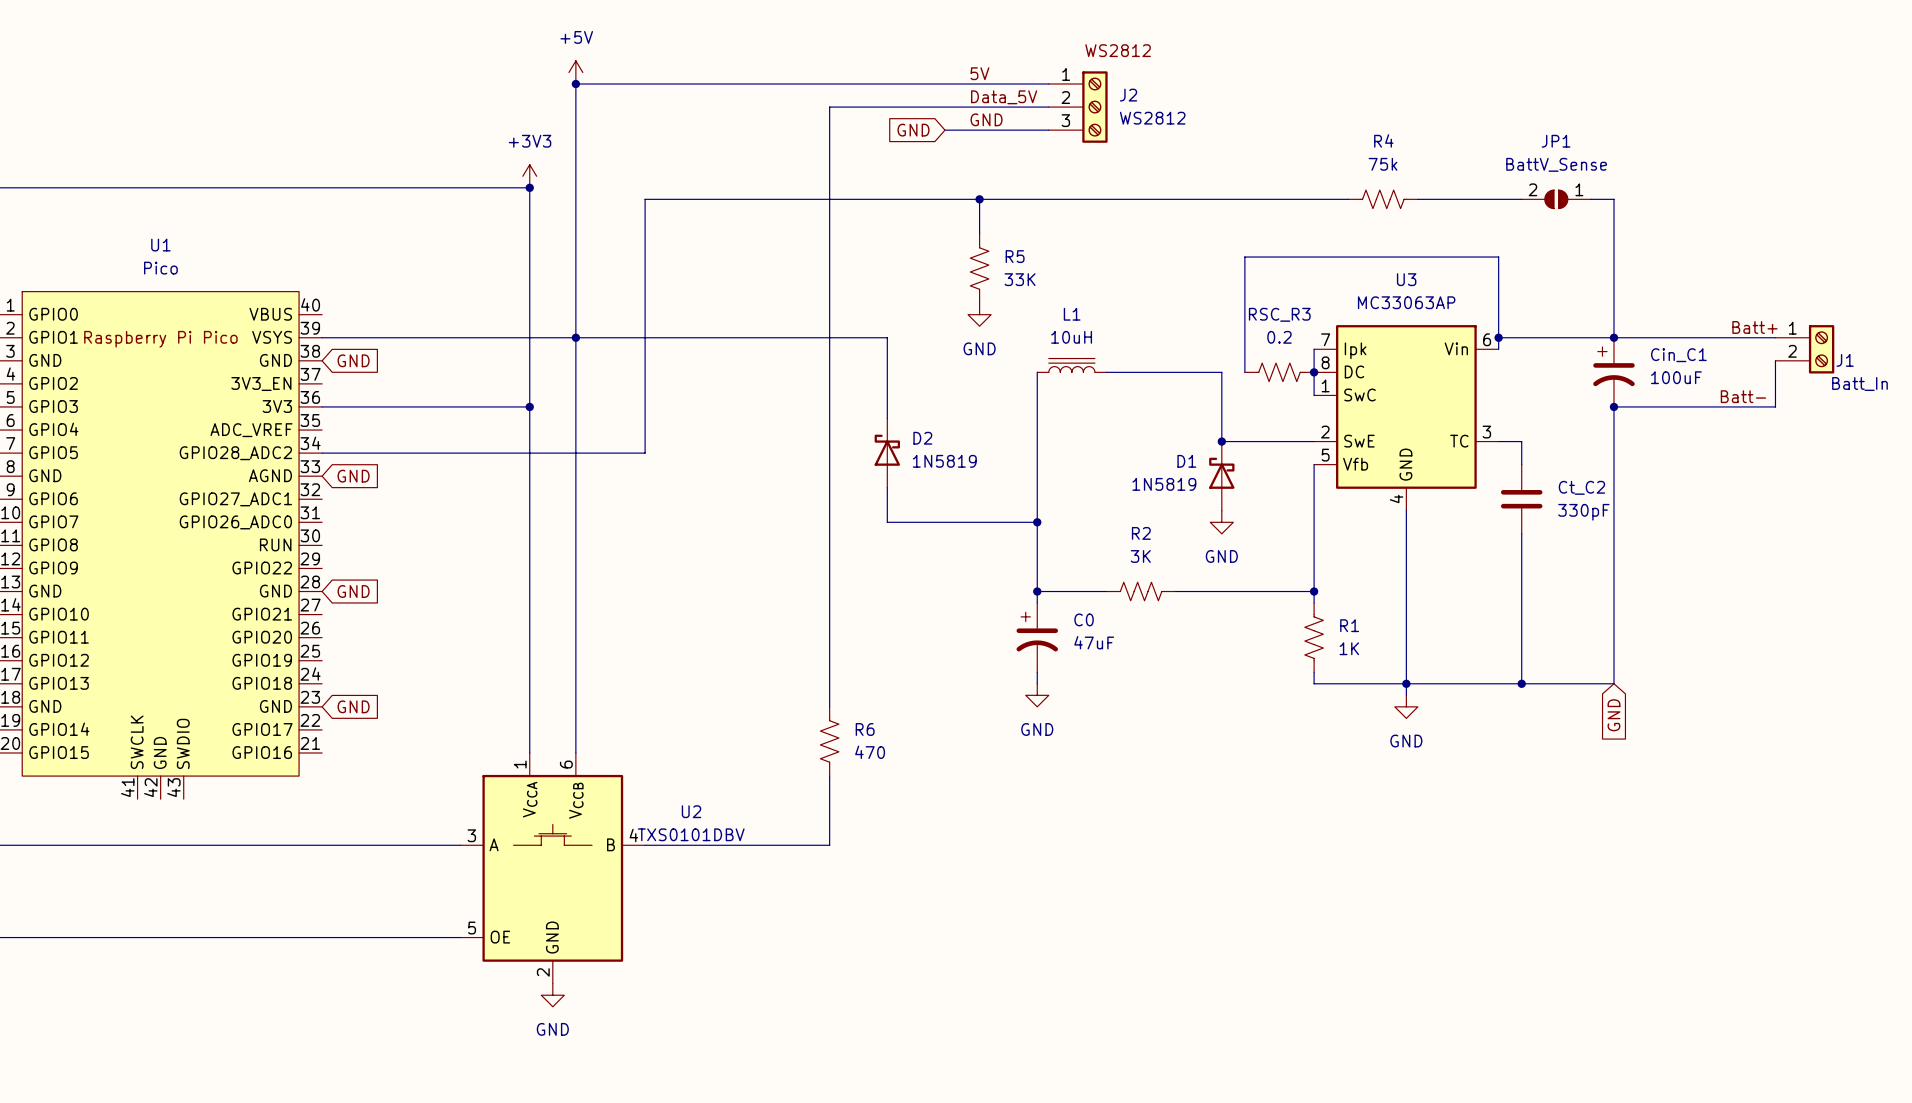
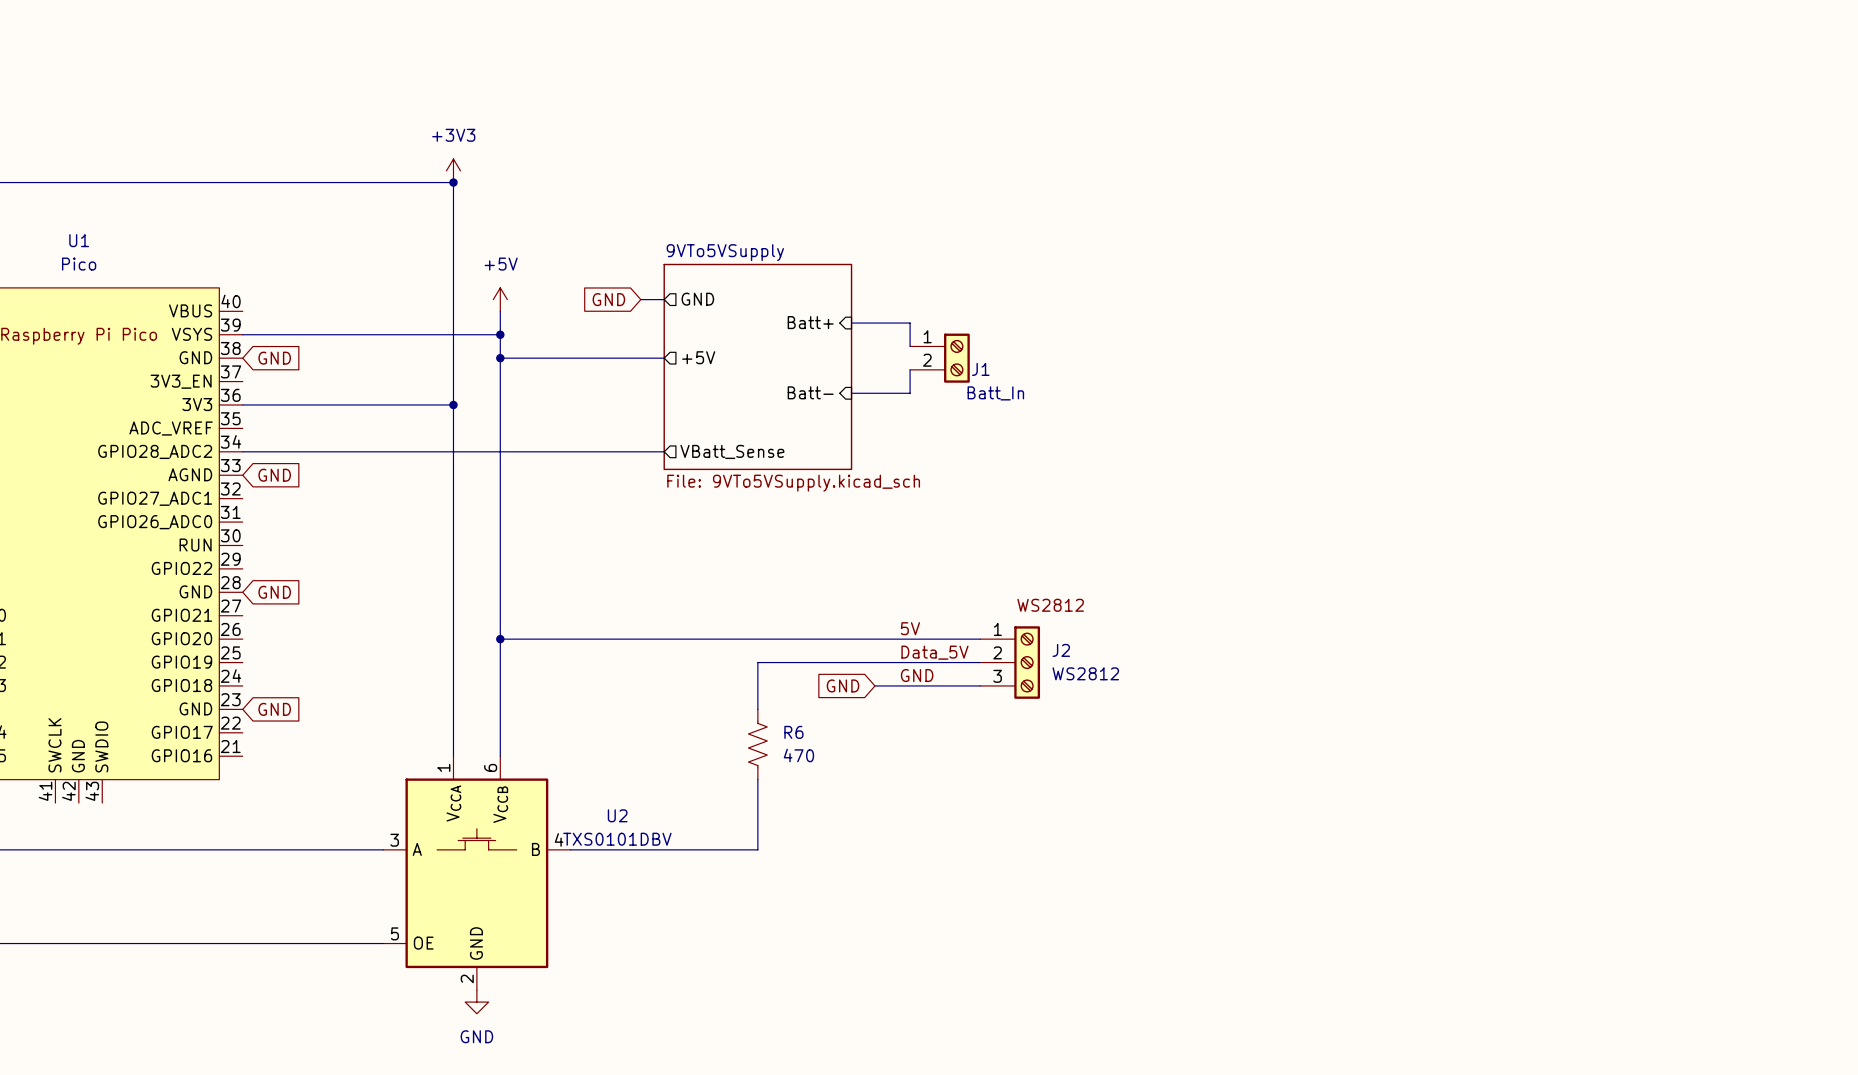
label: WS2812 (1118, 50) -> none
power symbol: +5V (575, 72) -> none
label: 5V (979, 73) -> none
junction: (575, 84) -> none
wire: (1048, 84) (575, 84) (575, 314) -> none
label: Data_5V (1004, 97) -> none
wire: (1048, 107) (829, 107) (829, 660) -> (980, 662) (757, 662)
J2 position: (1078, 107) -> (1010, 662)
label: GND (986, 119) -> none
global label: GND (913, 130) -> none
wire: (944, 130) (1048, 130) -> none
wire: (979, 199) (979, 233) -> none
junction: (979, 199) -> none
wire: (1348, 199) (645, 199) (645, 453) -> (664, 451) (570, 451)
R4: 75k (1383, 199) -> none
wire: (1417, 199) (1521, 199) -> none
JP1: BattV_Sense (1556, 199) -> none
wire: (1590, 199) (1613, 199) (1613, 337) -> none
R5: 33K (979, 268) -> none
sheet pin: none -> GND (697, 299)
power symbol: none -> +5V (500, 299)
global label: none -> GND (608, 299)
wire: none -> (640, 299) (664, 299)
power symbol: GND (979, 314) -> none
sheet pin: none -> Batt+ (810, 322)
wire: none -> (851, 323) (910, 323) (910, 346)
label: Batt+ (1754, 327) -> none
wire: (575, 337) (887, 337) (887, 418) -> none
wire: (1498, 337) (1775, 337) -> none
junction: (1498, 337) -> none
junction: (1613, 337) -> none
wire: (1314, 349) (1314, 395) -> none
wire: (1498, 349) (1498, 257) (1244, 257) (1244, 372) -> none
J1 position: (1804, 349) -> (939, 358)
wire: none -> (500, 358) (664, 358)
junction: none -> (500, 358)
sheet pin: none -> +5V (698, 357)
wire: (1775, 360) (1775, 406) (1613, 406) (1613, 683) (1314, 683) (1314, 672) -> none
L1: 10uH (1071, 365) -> none
sheet 9VTo5VSupply: none -> File: 9VTo5VSupply.kicad_sch (757, 366)
wire: none -> (910, 369) (910, 393) (851, 393)
wire: (1037, 372) (1037, 603) -> none
wire: (1106, 372) (1221, 372) (1221, 441) (1314, 441) -> none
RSC_R3: 0.2 (1279, 372) -> none
junction: (1314, 372) -> none
Cin_C1: 100uF (1613, 372) -> none
sheet pin: none -> Batt- (810, 392)
label: Batt- (1743, 396) -> none
junction: (1613, 406) -> none
U3: MC33063AP (1406, 417) -> none
junction: (1221, 441) -> none
wire: (1498, 441) (1521, 441) (1521, 464) -> none
sheet pin: none -> VBatt_Sense (732, 451)
D2: 1N5819 (887, 453) -> none
wire: (1314, 464) (1314, 603) -> none
D1: 1N5819 (1221, 476) -> none
wire: (887, 487) (887, 522) (1037, 522) -> none
Ct_C2: 330pF (1521, 499) -> none
wire: (1406, 510) (1406, 695) -> none
junction: (1037, 522) -> none
power symbol: GND (1221, 522) -> none
wire: (1521, 533) (1521, 683) -> none
wire: (1037, 591) (1106, 591) -> none
junction: (1037, 591) -> none
R2: 3K (1141, 591) -> none
wire: (1175, 591) (1314, 591) -> none
junction: (1314, 591) -> none
label: none -> WS2812 (1050, 605)
label: none -> 5V (910, 628)
wire: none -> (500, 639) (980, 639)
junction: none -> (500, 639)
C0: 47uF (1037, 637) -> none
R1: 1K (1314, 637) -> none
label: none -> Data_5V (934, 652)
wire: (1037, 672) (1037, 683) -> none
label: none -> GND (917, 675)
global label: none -> GND (843, 685)
wire: none -> (874, 685) (980, 685)
junction: (1406, 683) -> none
junction: (1521, 683) -> none
power symbol: GND (1037, 695) -> none
power symbol: GND (1406, 706) -> none
global label: GND (1613, 715) -> none

